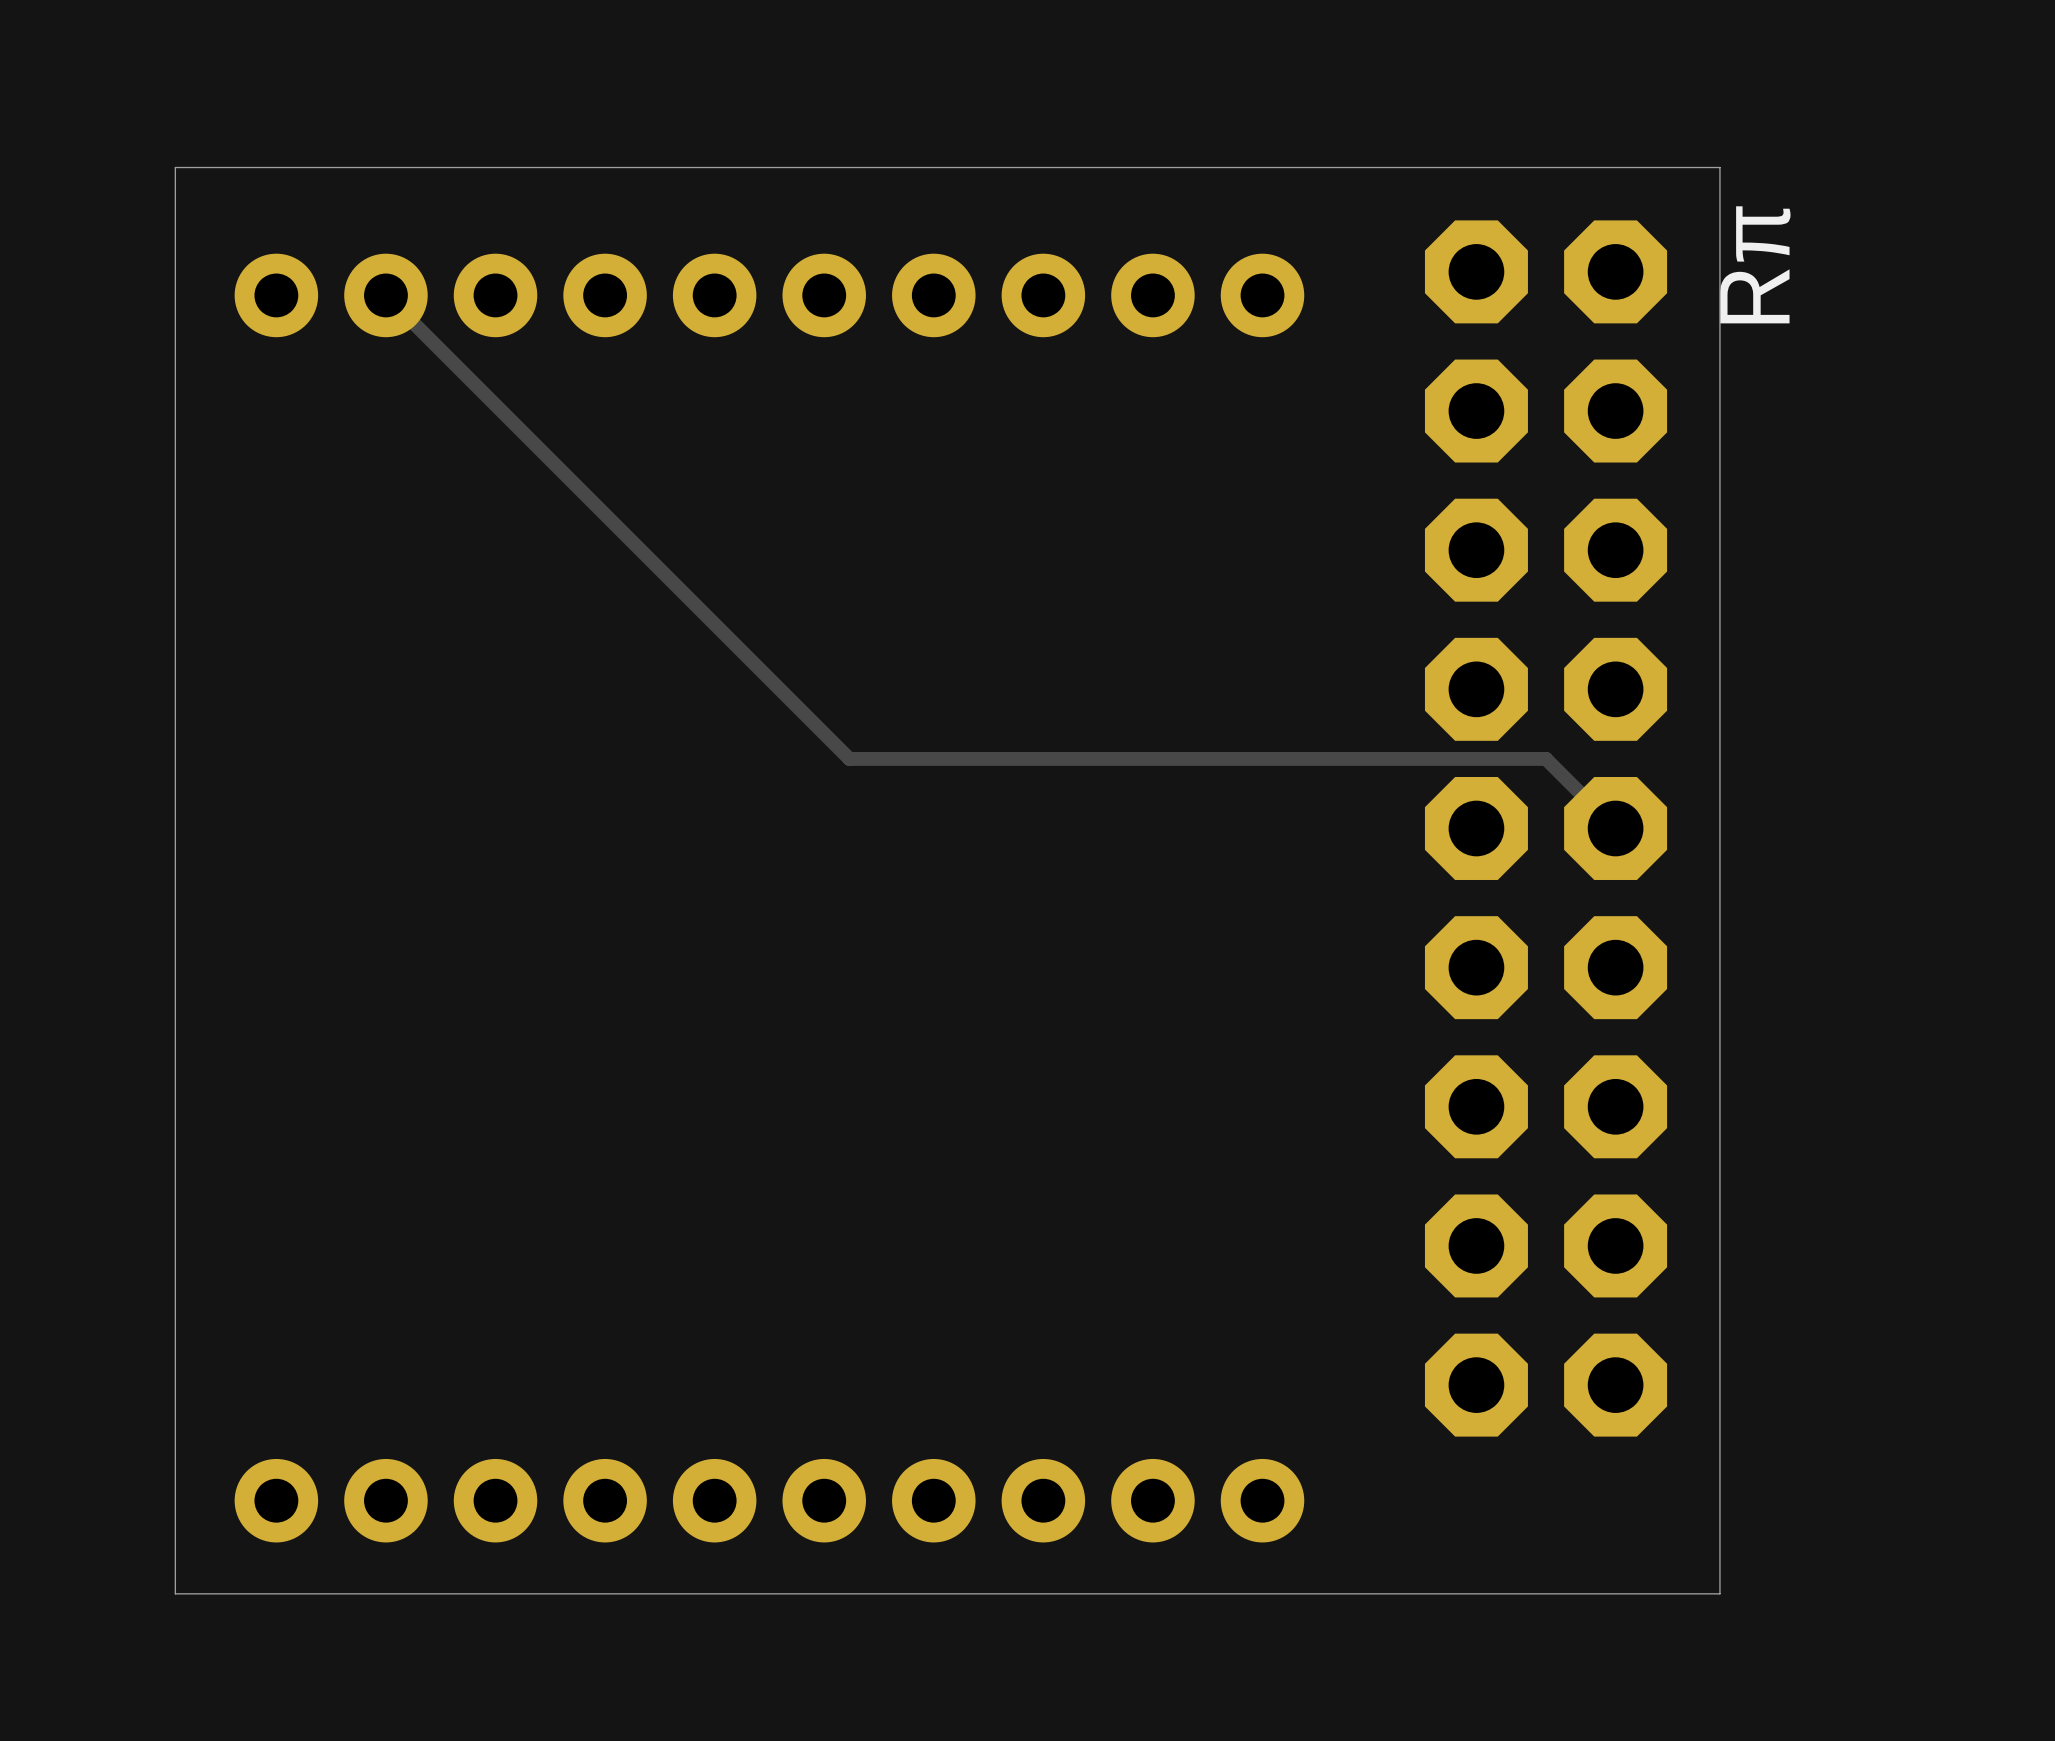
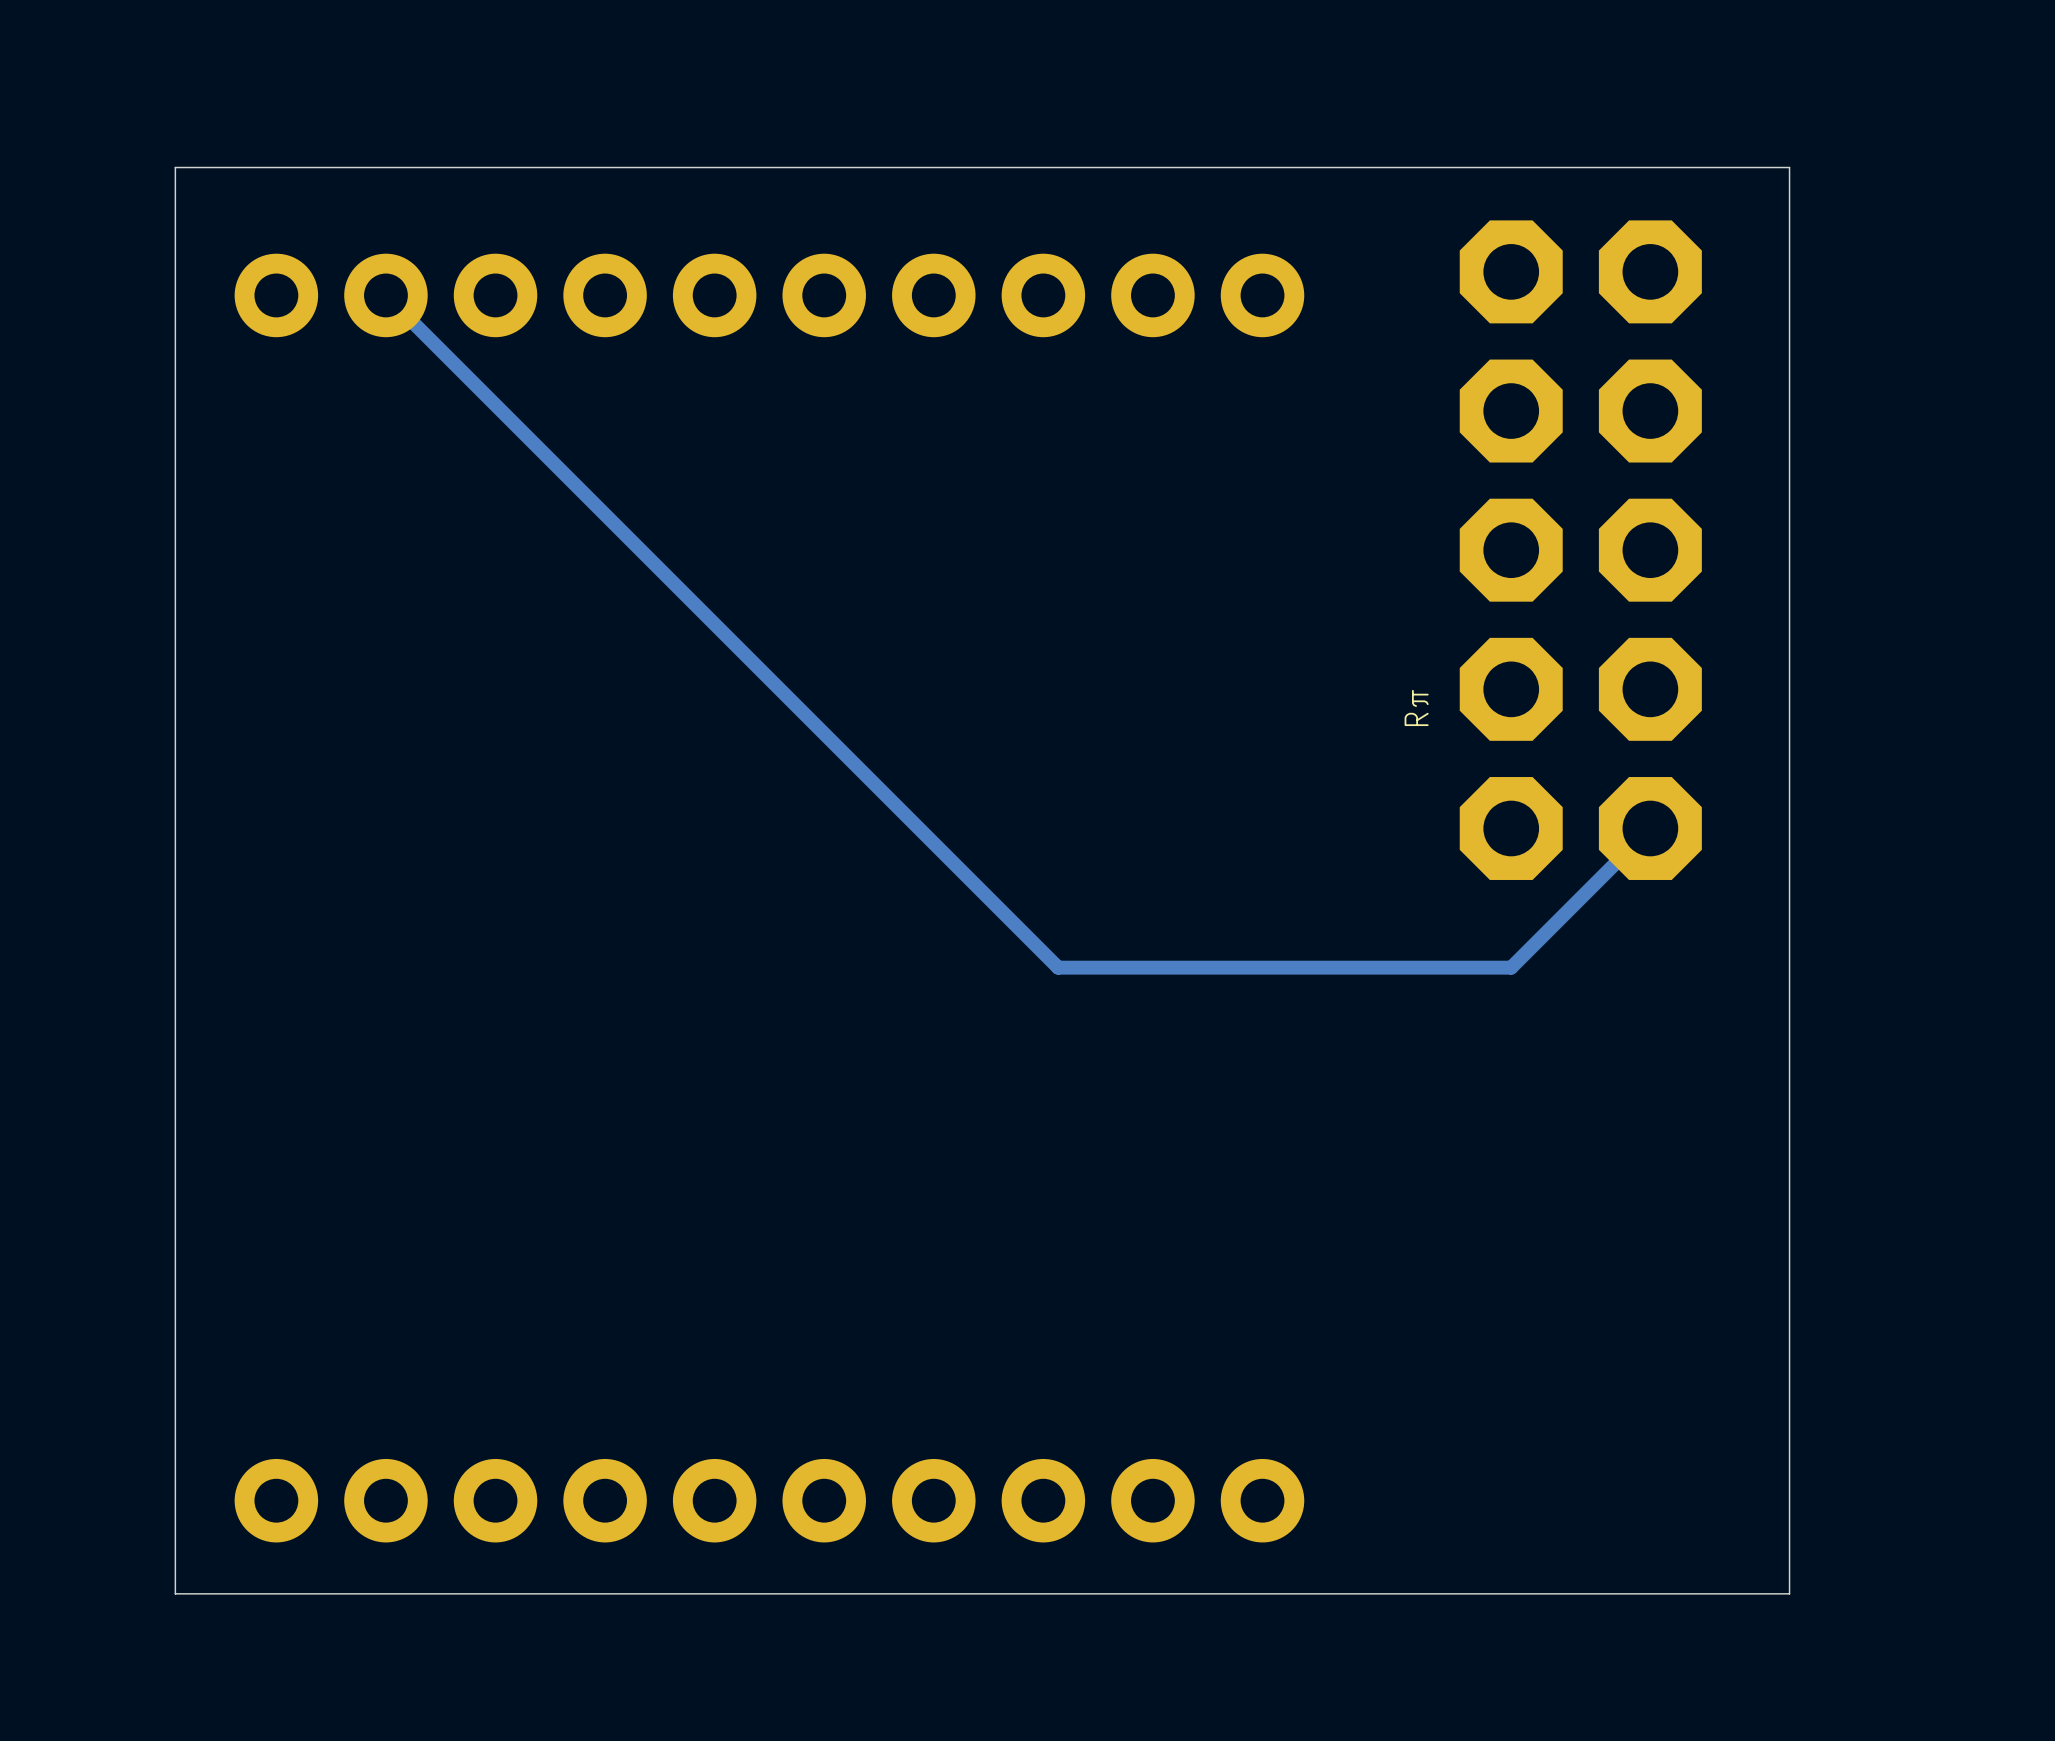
board edge: (1719, 167) (1719, 1593) -> (1719, 167) (1789, 167) (1789, 1593) (1719, 1593)
Rπ: none -> (1580, 550)
track: (849, 758) (1546, 758) (1615, 828) -> (849, 758) (1058, 967) (1511, 967) (1650, 828)
Rπ: (1546, 828) -> none

